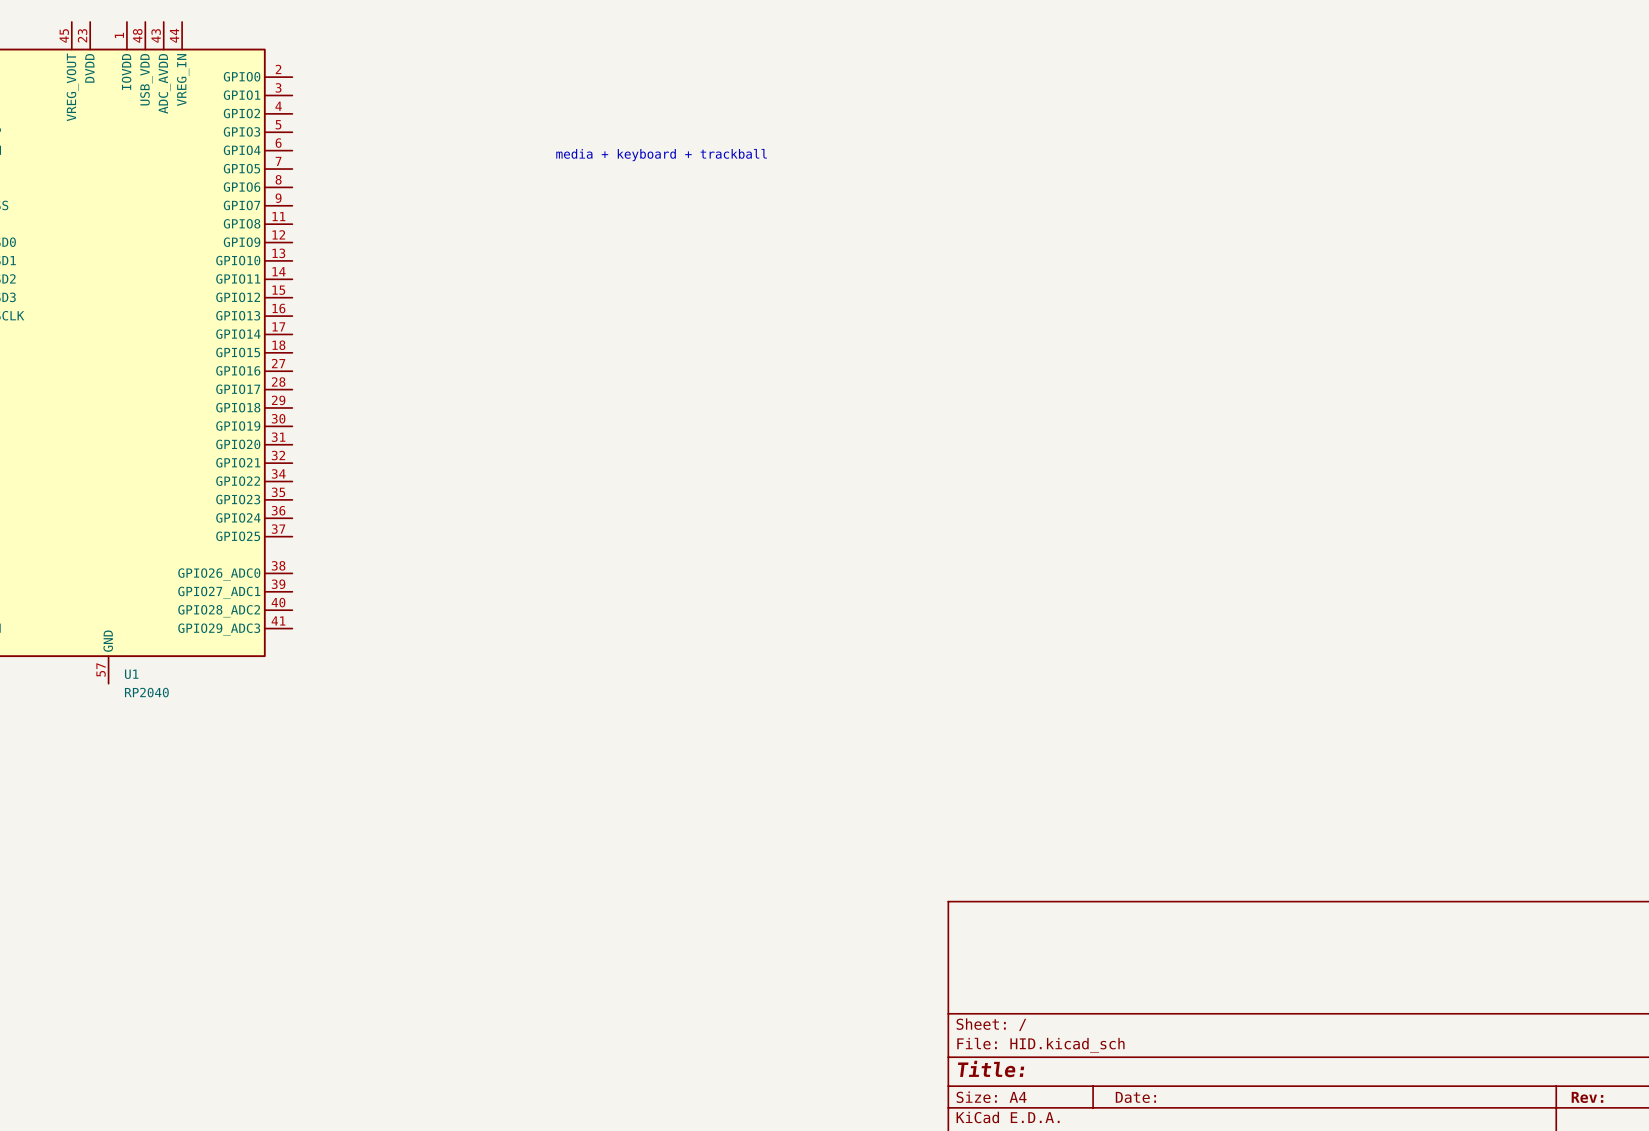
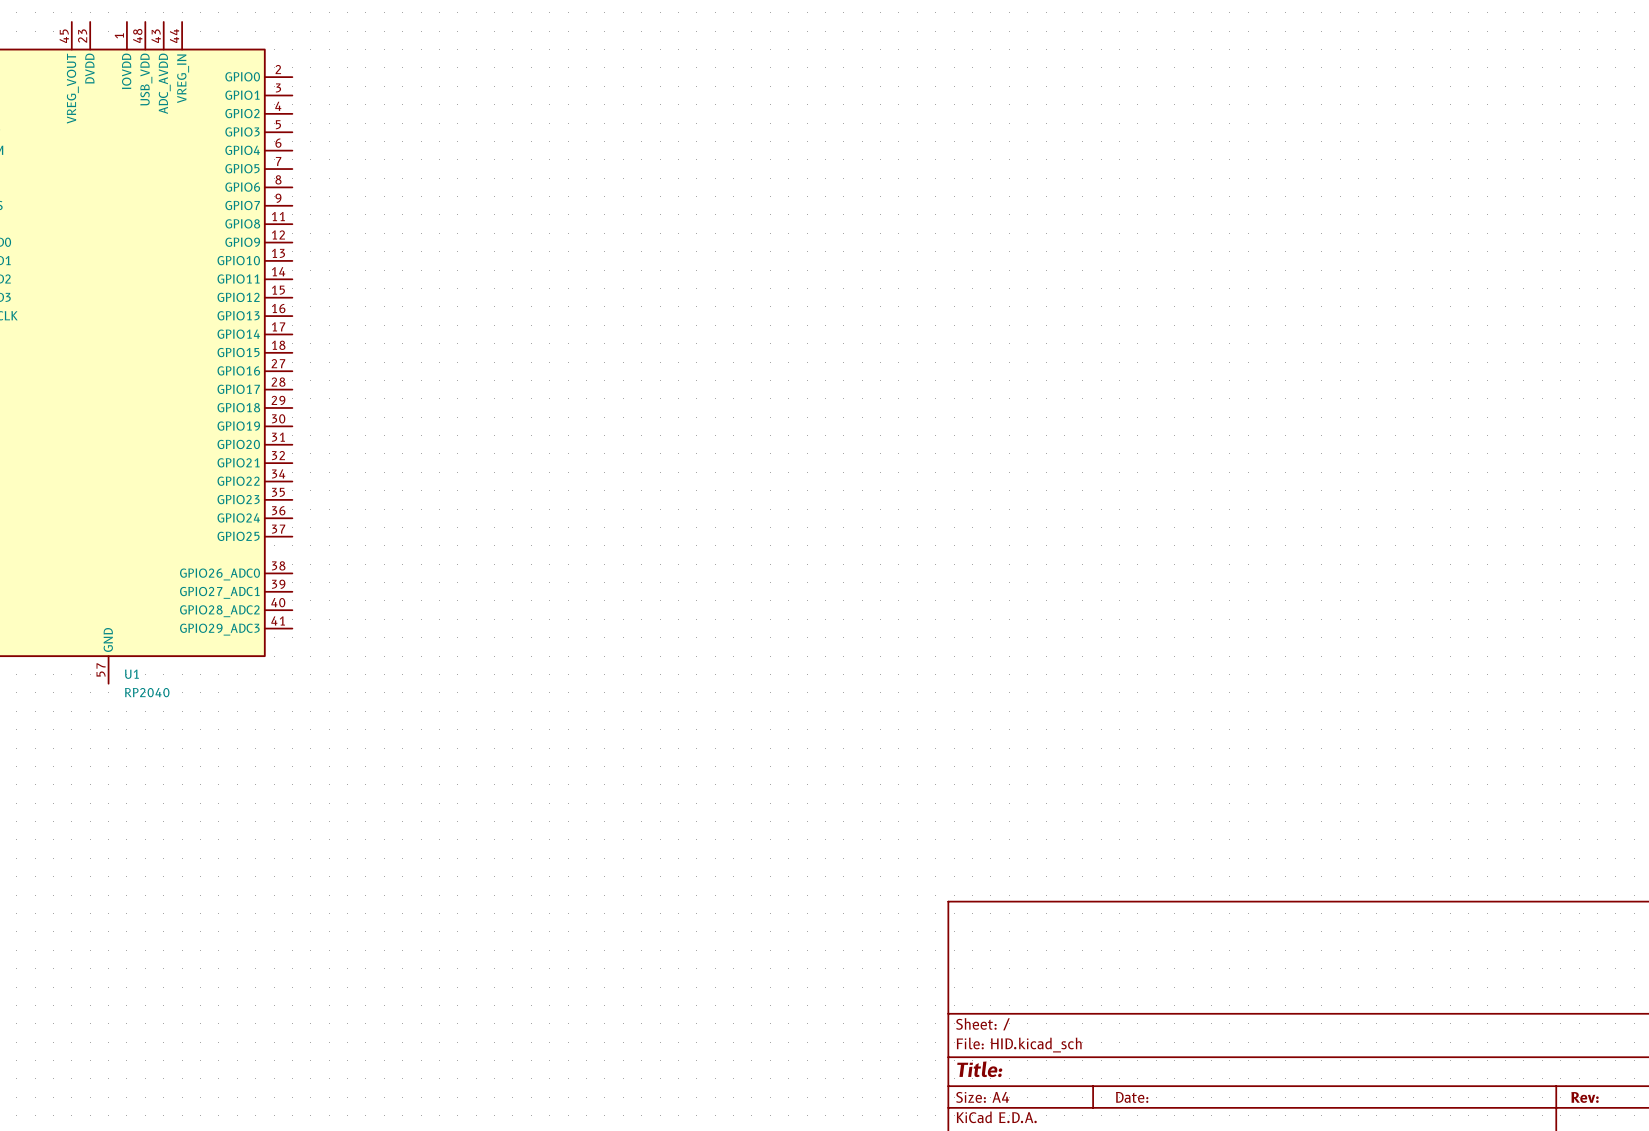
text: media + keyboard + trackball (661, 155) -> none

